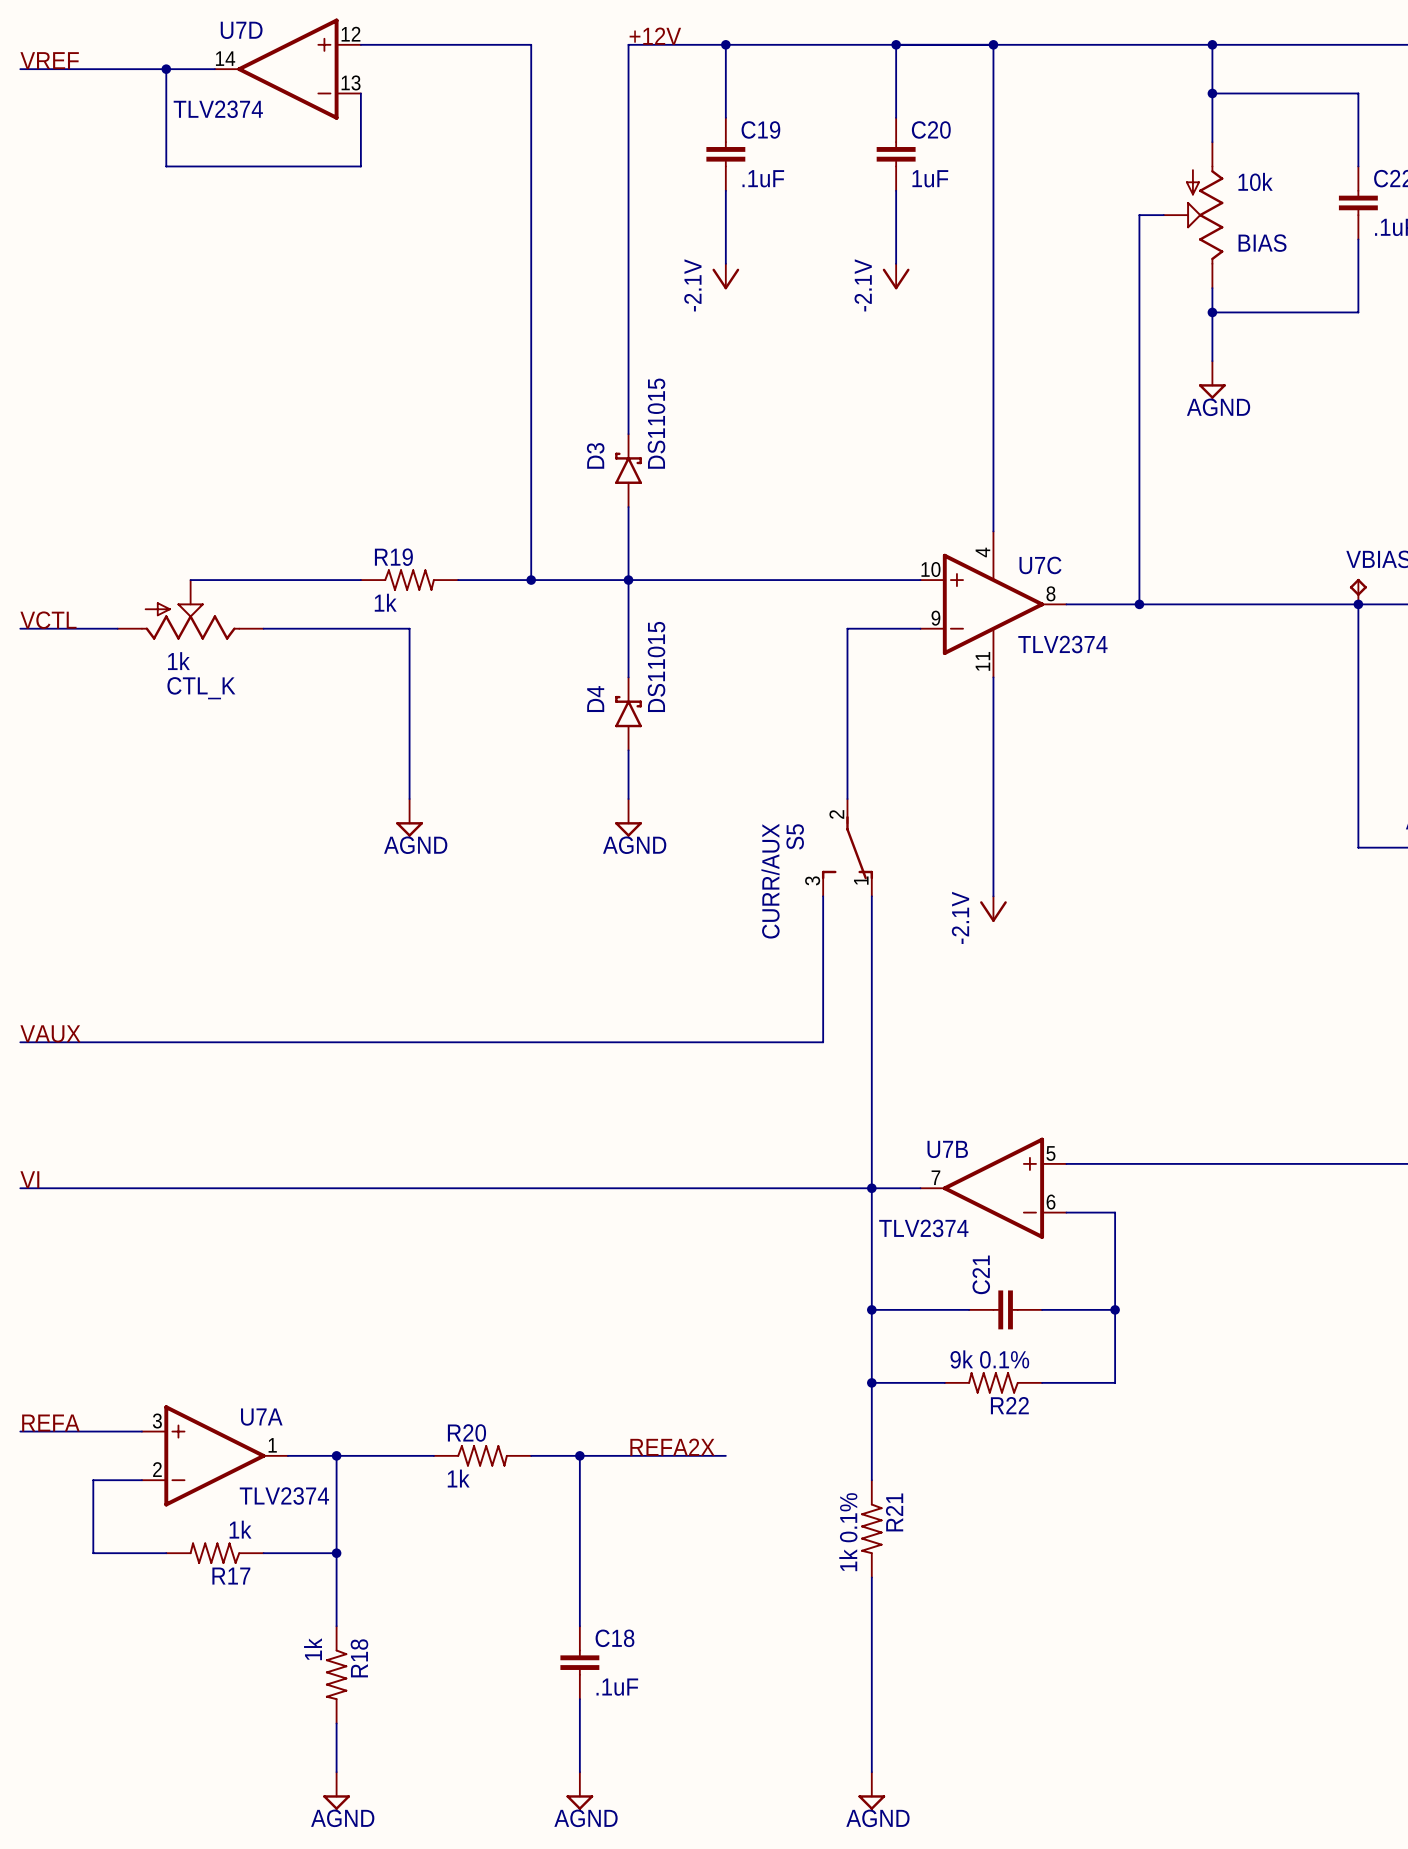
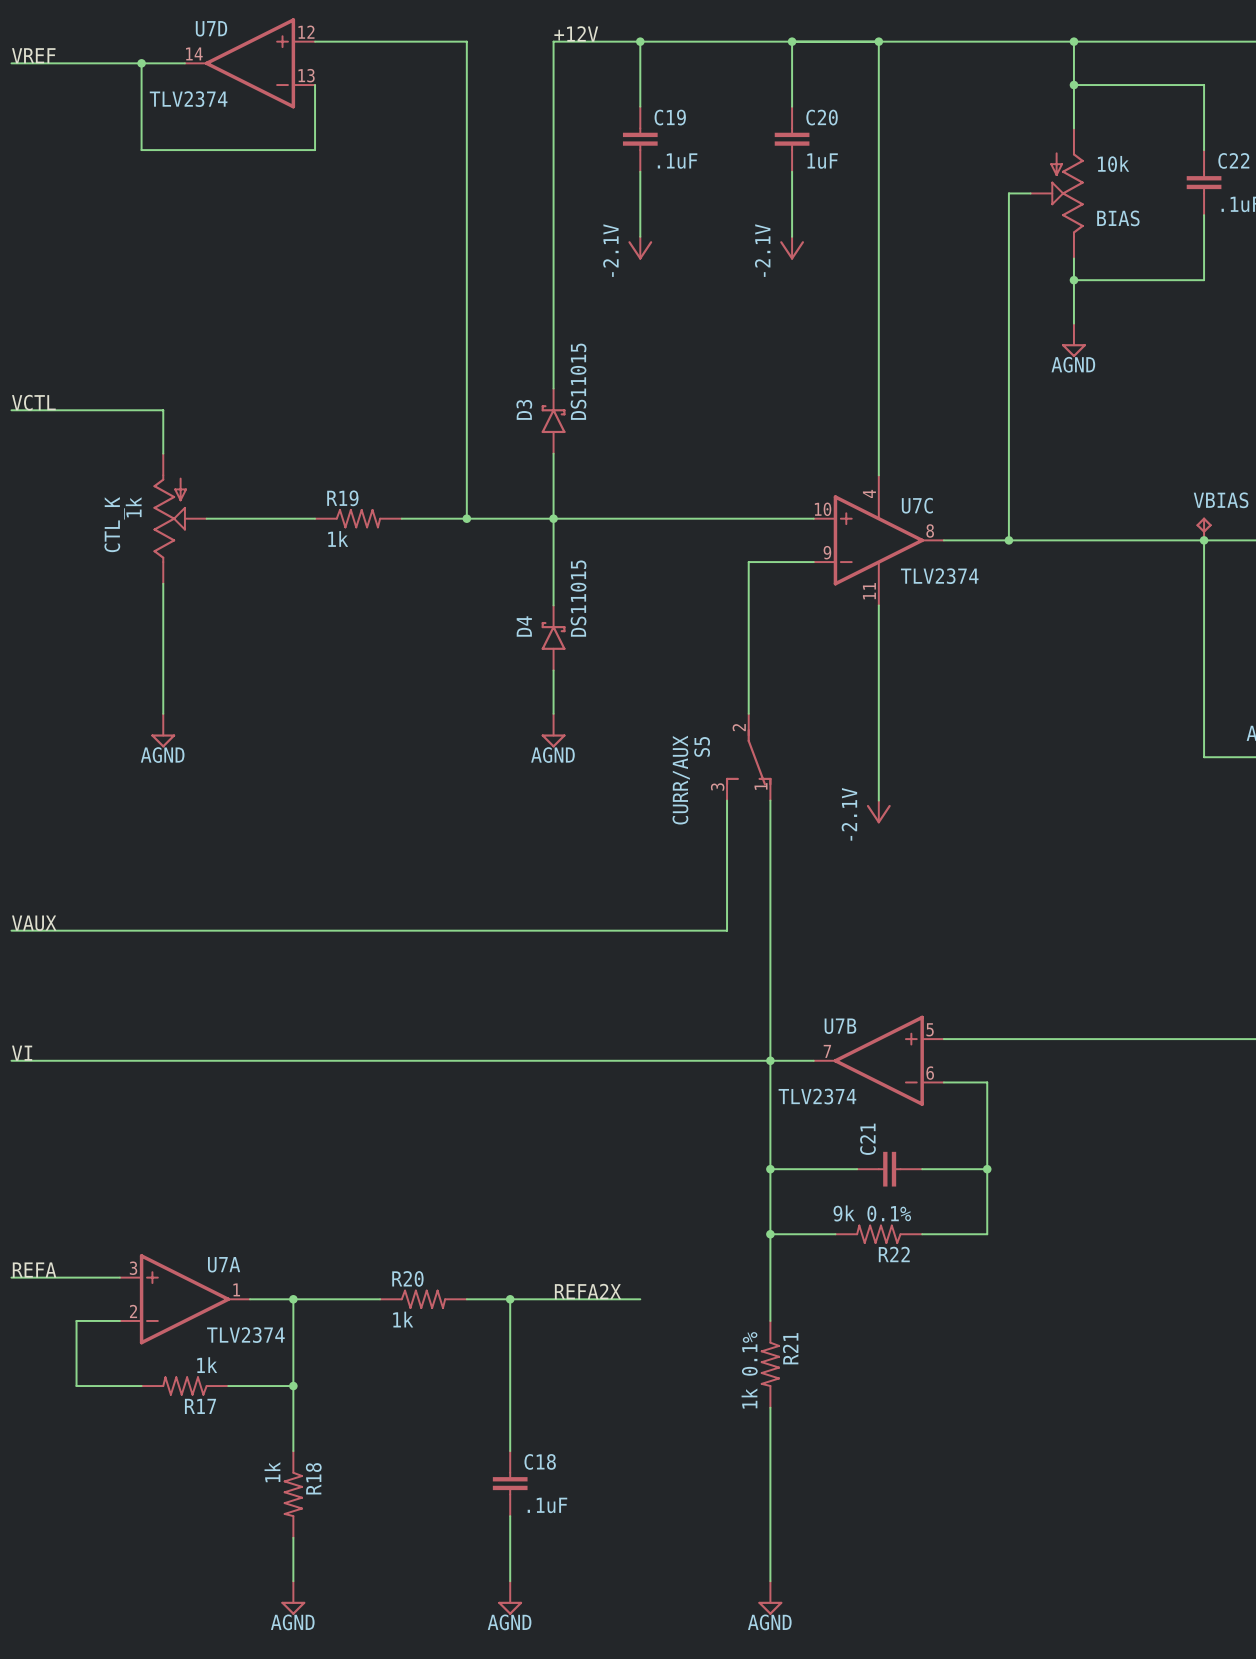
wire: none -> (11, 410) (163, 410) (163, 453)
label position: VCTL (48, 620) -> VCTL (33, 402)
CTL_K rotation: 0° (190, 621) -> 90° clockwise (170, 518)
wire: (20, 628) (117, 628) -> none
wire: (263, 628) (409, 628) (409, 799) -> none
wire: none -> (163, 583) (163, 713)
power symbol position: AGND (409, 817) -> AGND (163, 730)

